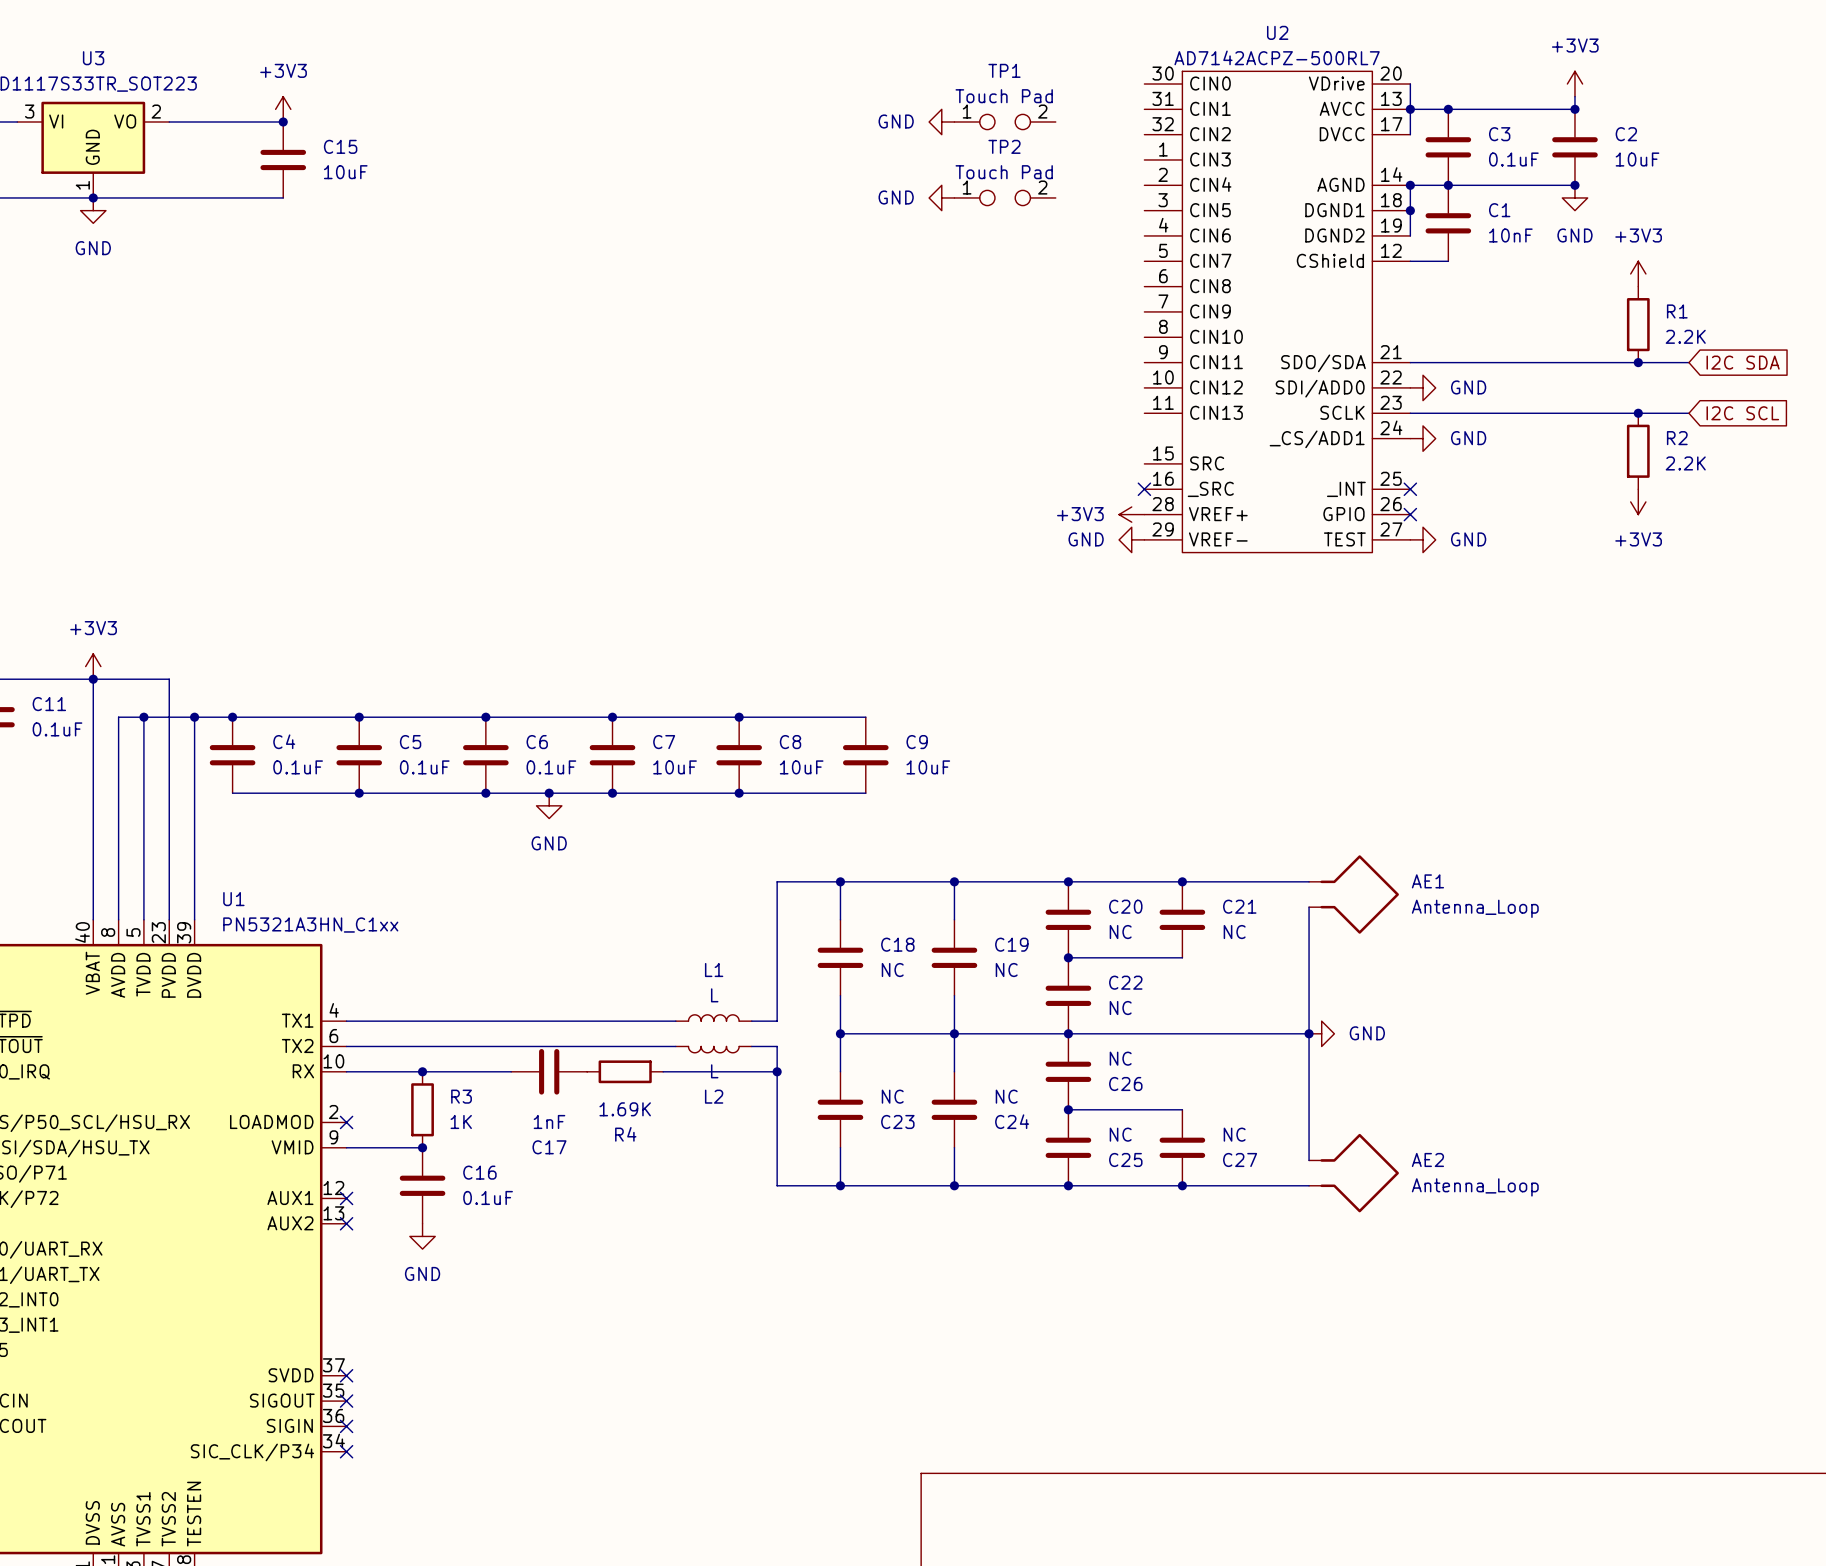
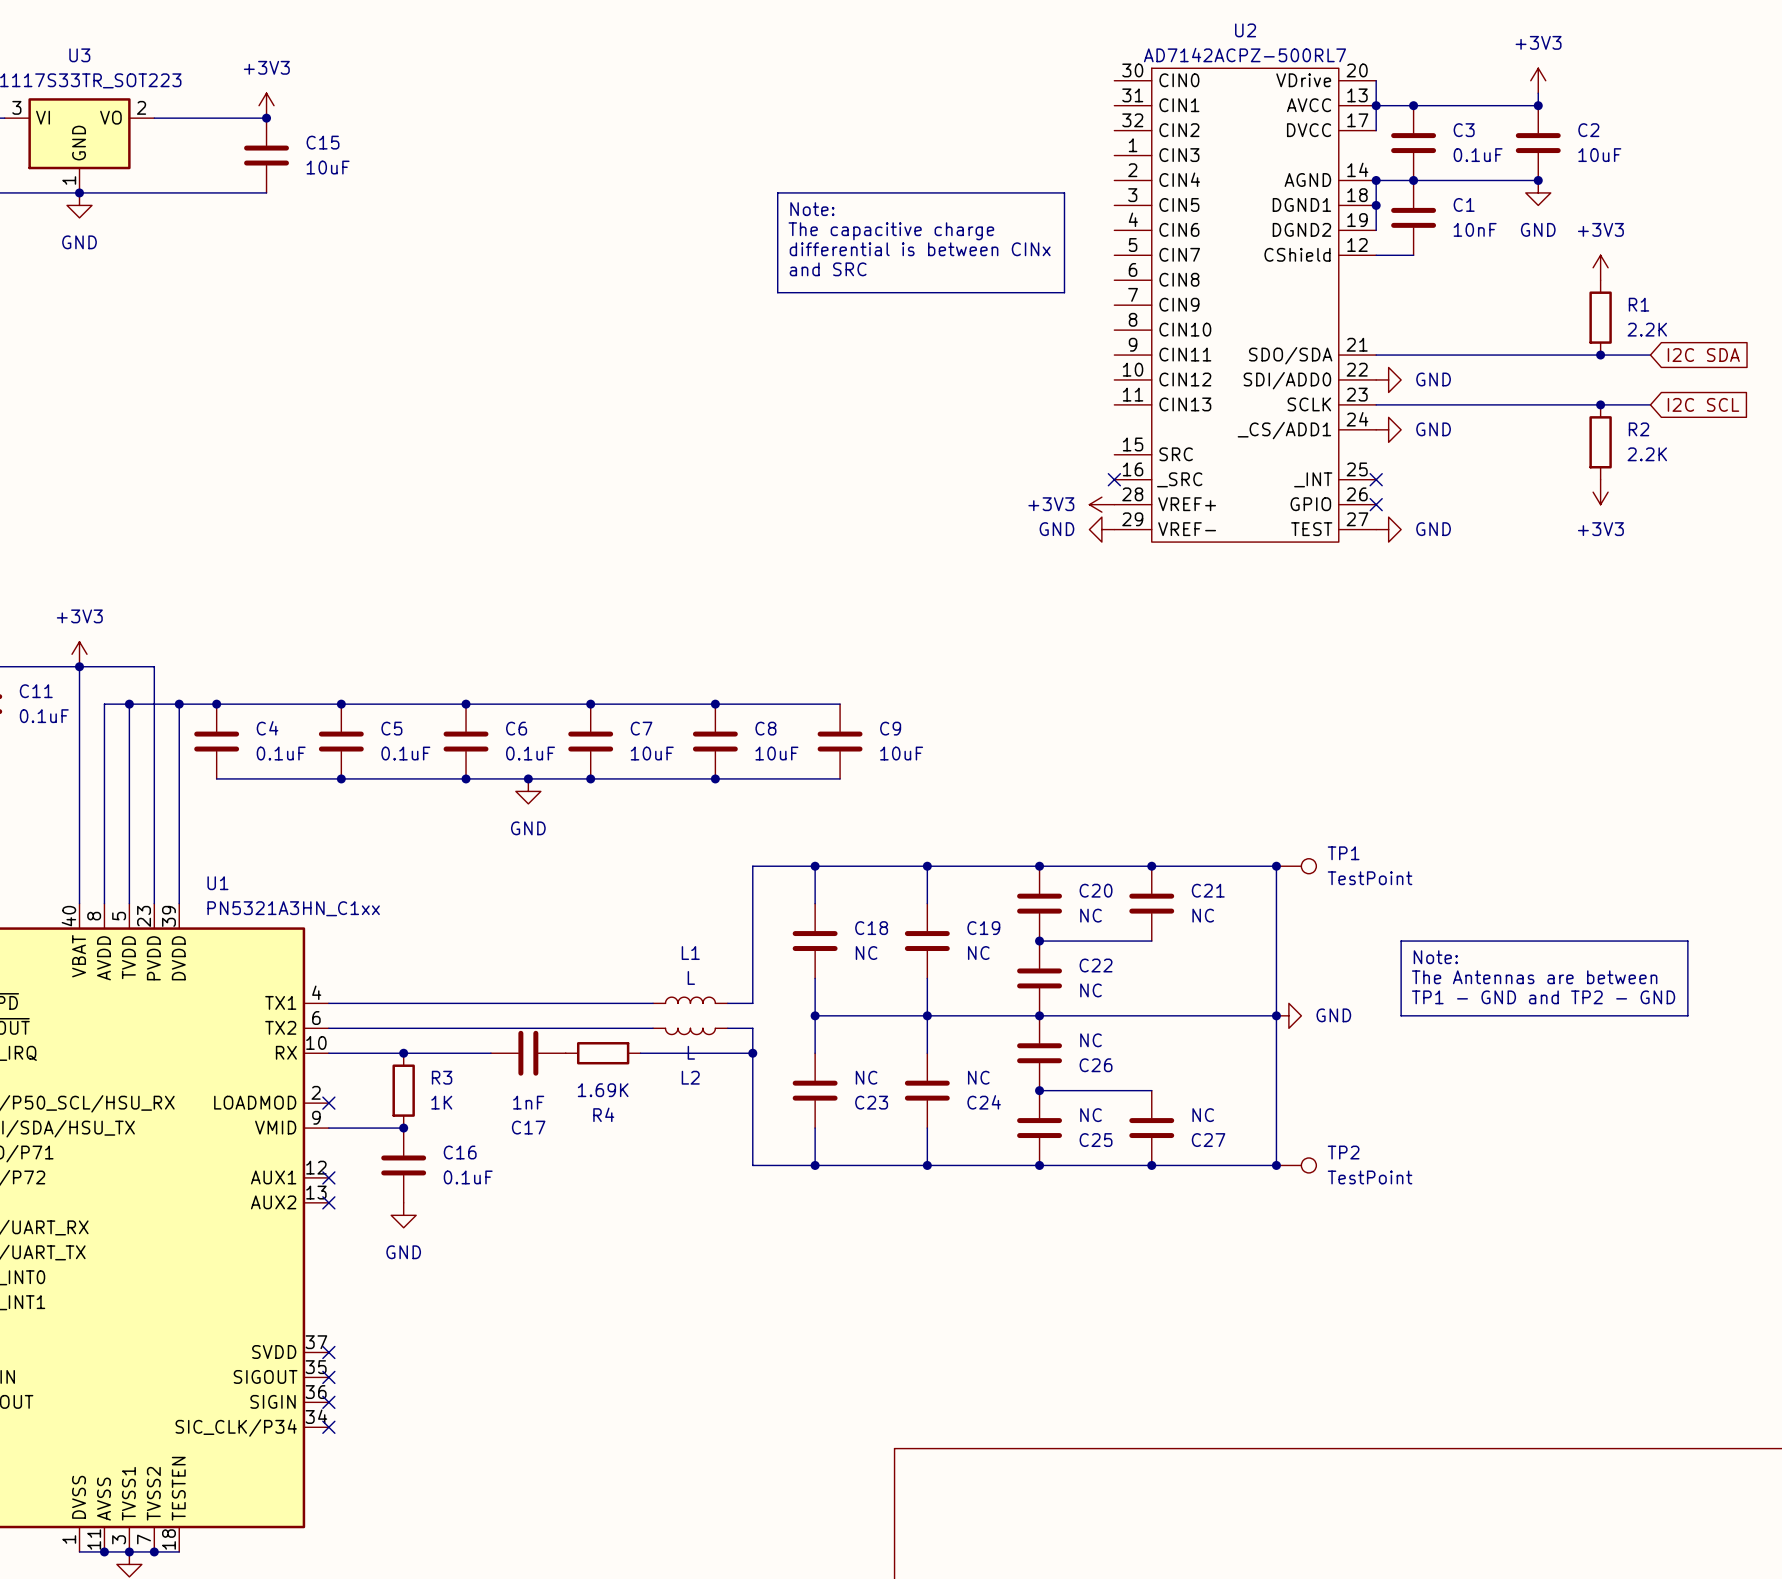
TP1 name position: TP1 (1004, 70) -> TP1 (1343, 853)
TP1 value: Touch Pad (1004, 96) -> TestPoint (1370, 878)
TP1 symbol: [954, 114, 1056, 130] -> [1276, 858, 1317, 874]
power symbol: GND (941, 121) -> none
TP2 name position: TP2 (1004, 146) -> TP2 (1343, 1152)
TP2 value: Touch Pad (1004, 172) -> TestPoint (1370, 1177)
TP2 symbol: [954, 190, 1056, 206] -> [1276, 1157, 1317, 1173]
line: none -> (777, 192) (1064, 192) (1064, 292) (777, 292) (777, 192)
power symbol: GND (941, 197) -> none
text: none -> Note: (812, 209)
text: none -> The capacitive charge (891, 231)
text: none -> differential is between CINx (920, 249)
text: none -> and SRC (828, 269)
wire: none -> (1276, 866) (1276, 891)
junction: none -> (1276, 866)
AE1: Antenna_Loop (1353, 894) -> none
line: none -> (1401, 941) (1687, 941) (1687, 1015) (1401, 1015) (1401, 941)
text: none -> Note: (1435, 957)
text: none -> The Antennas are between (1534, 977)
text: none -> TP1 - GND and TP2 - GND (1543, 997)
wire: none -> (1276, 1140) (1276, 1165)
AE2: Antenna_Loop (1353, 1173) -> none
junction: none -> (1276, 1165)

